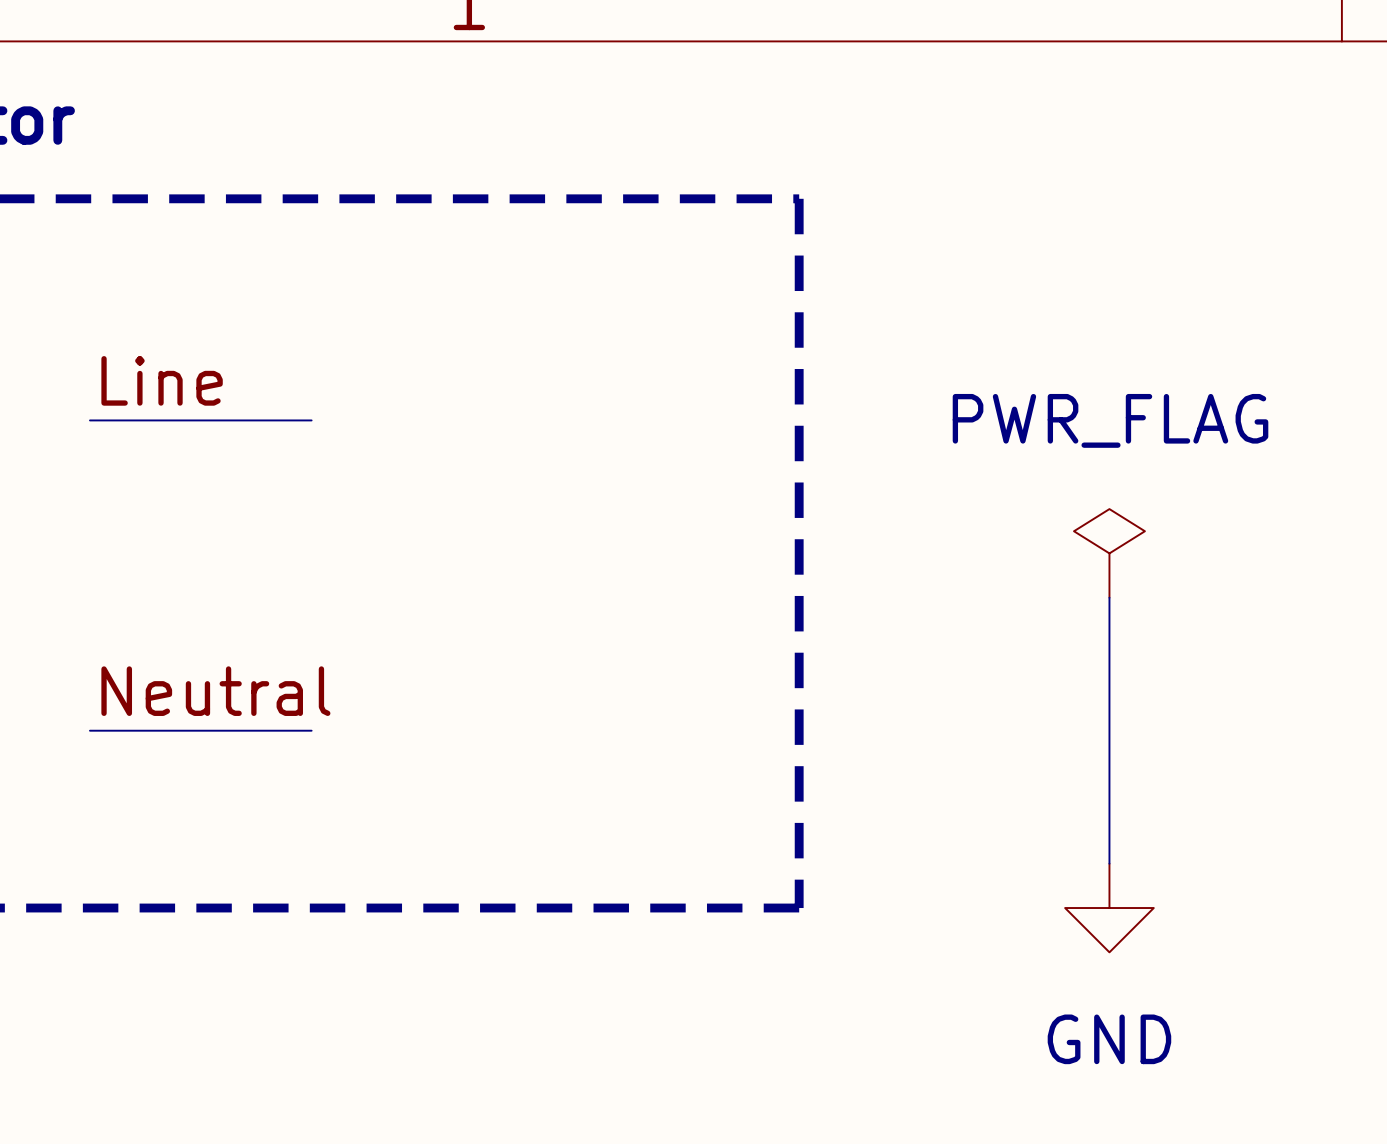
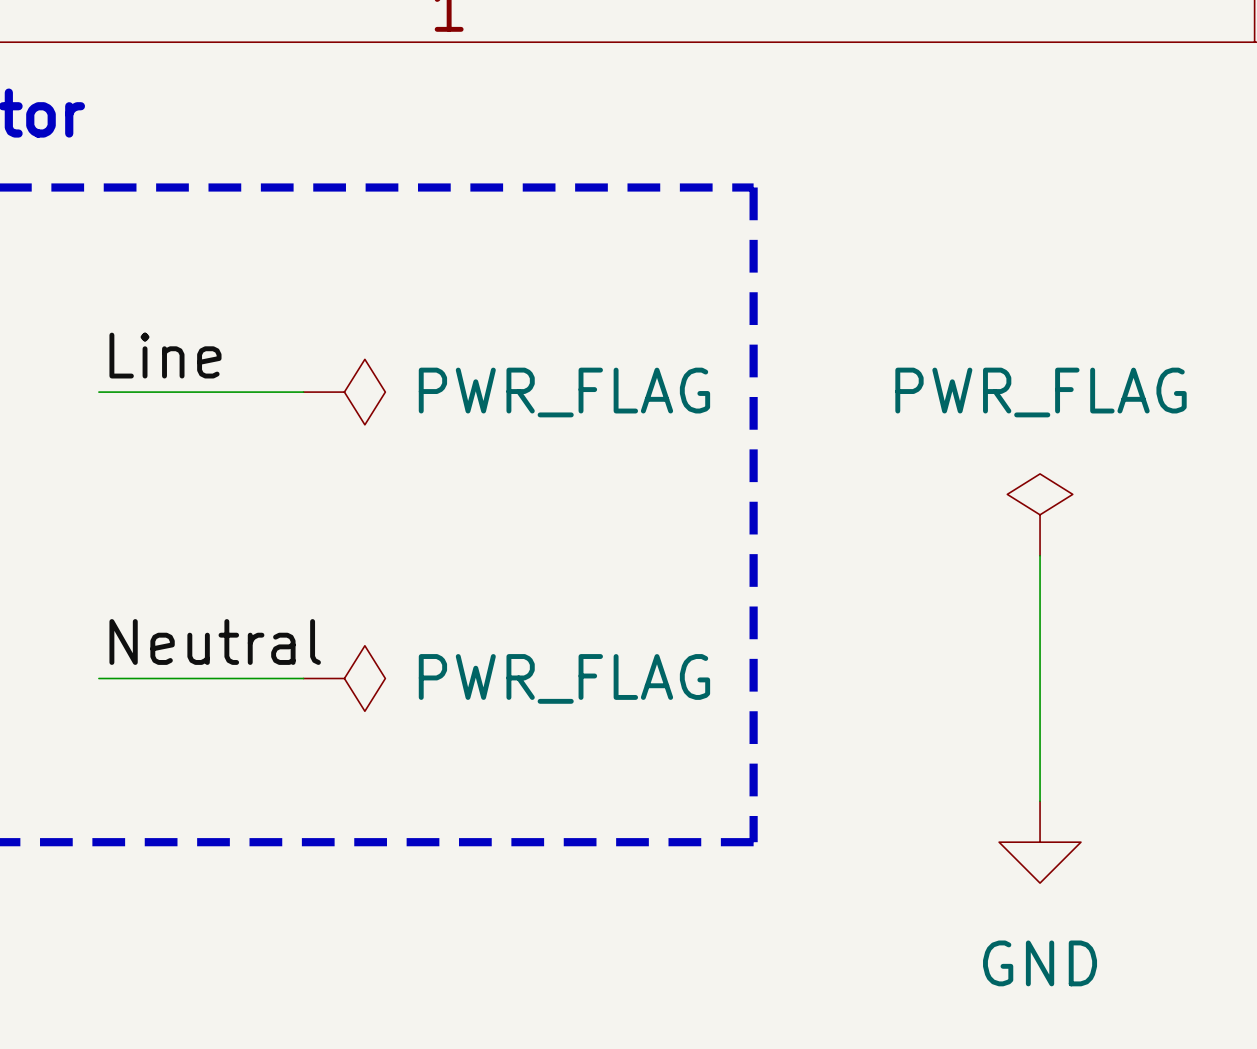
power symbol: none -> PWR_FLAG (344, 392)
power symbol: none -> PWR_FLAG (344, 678)

